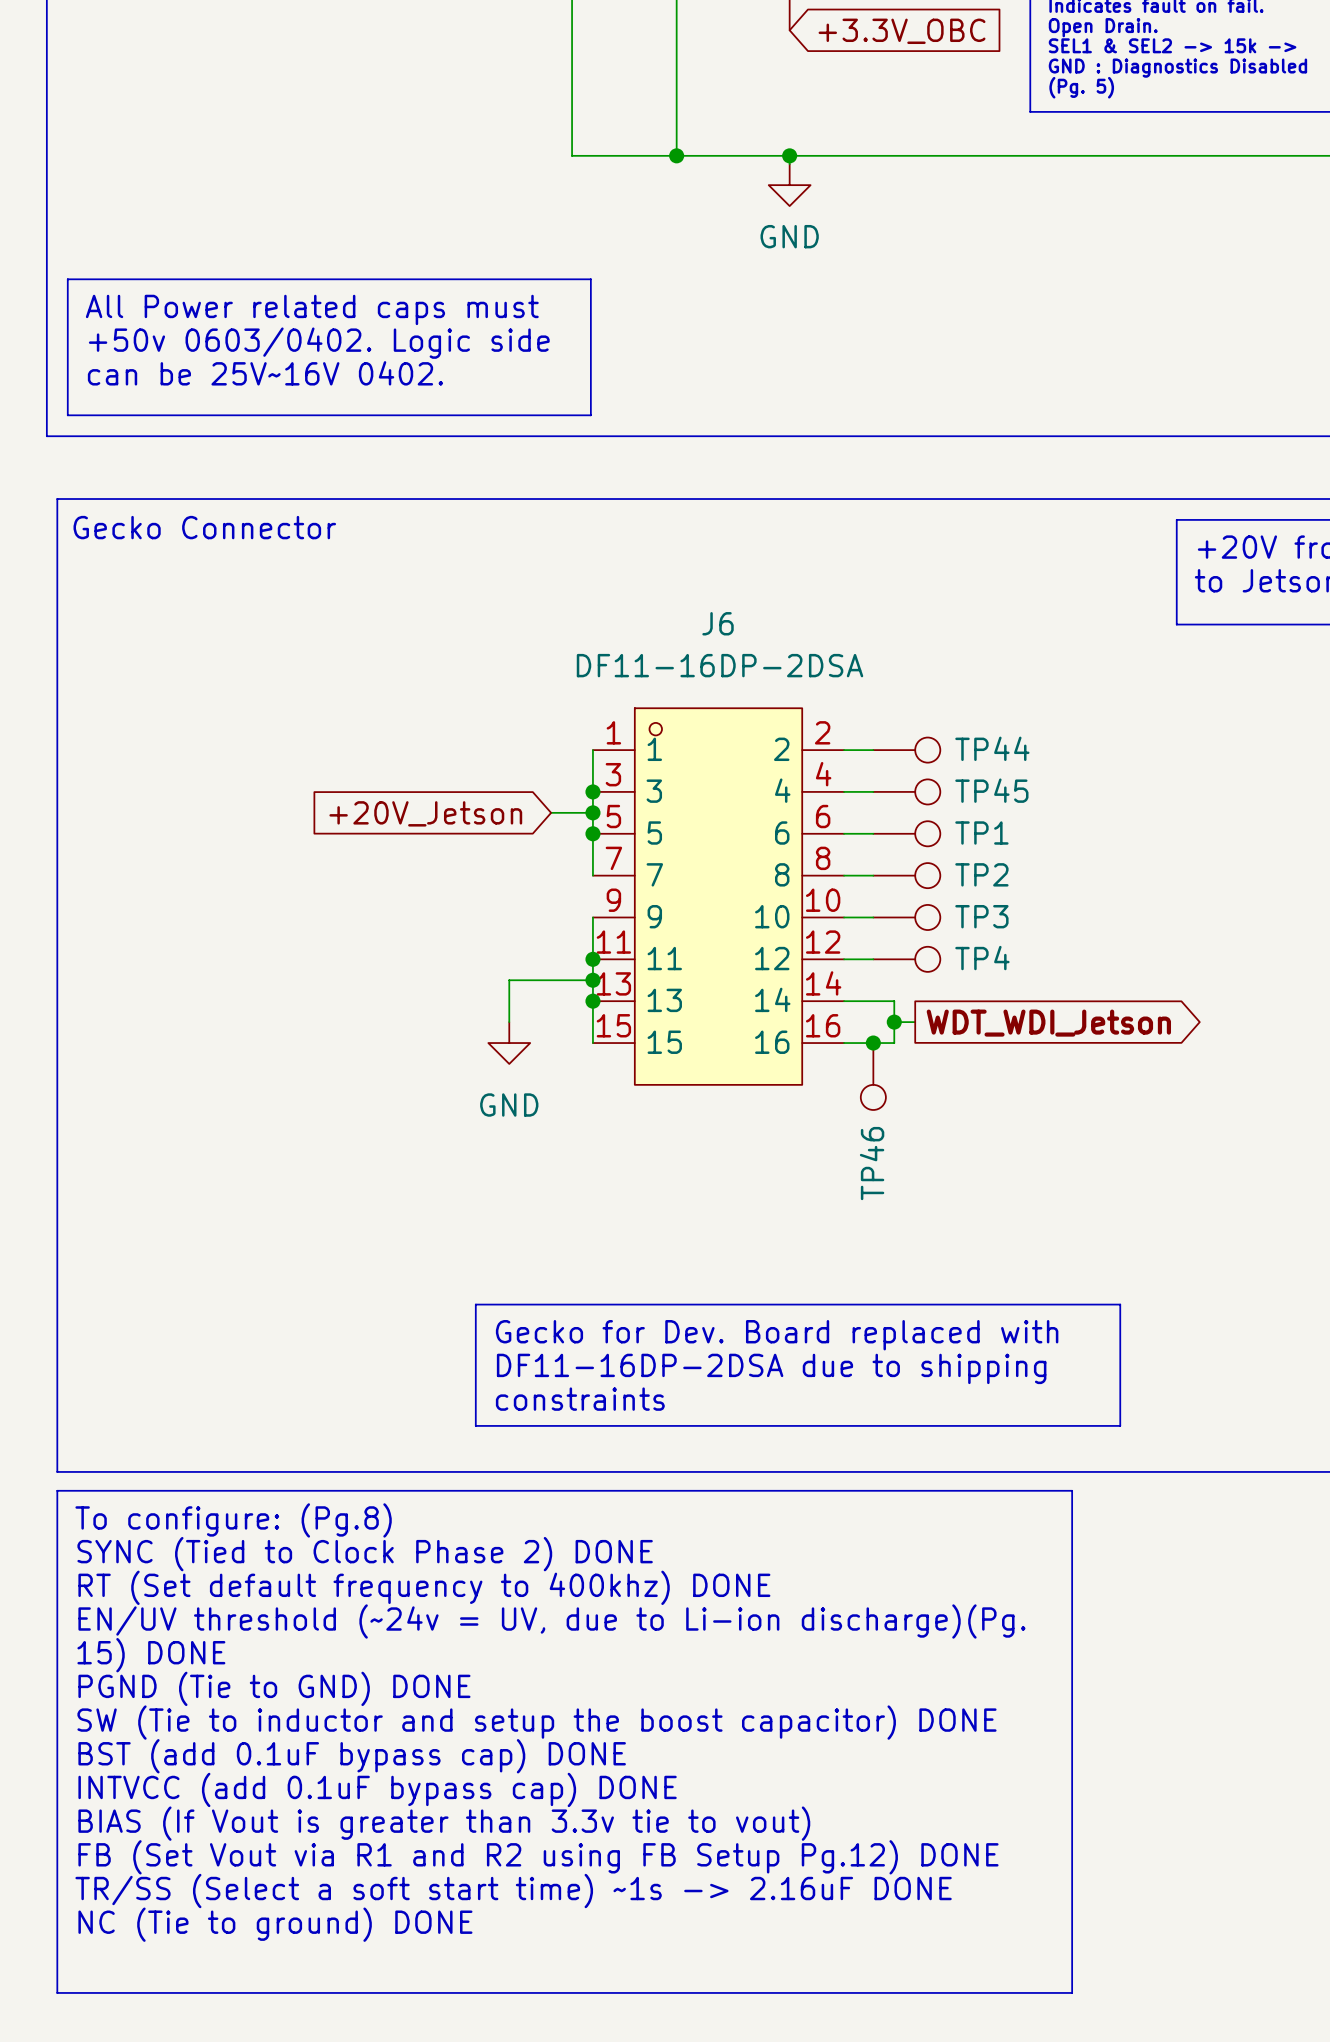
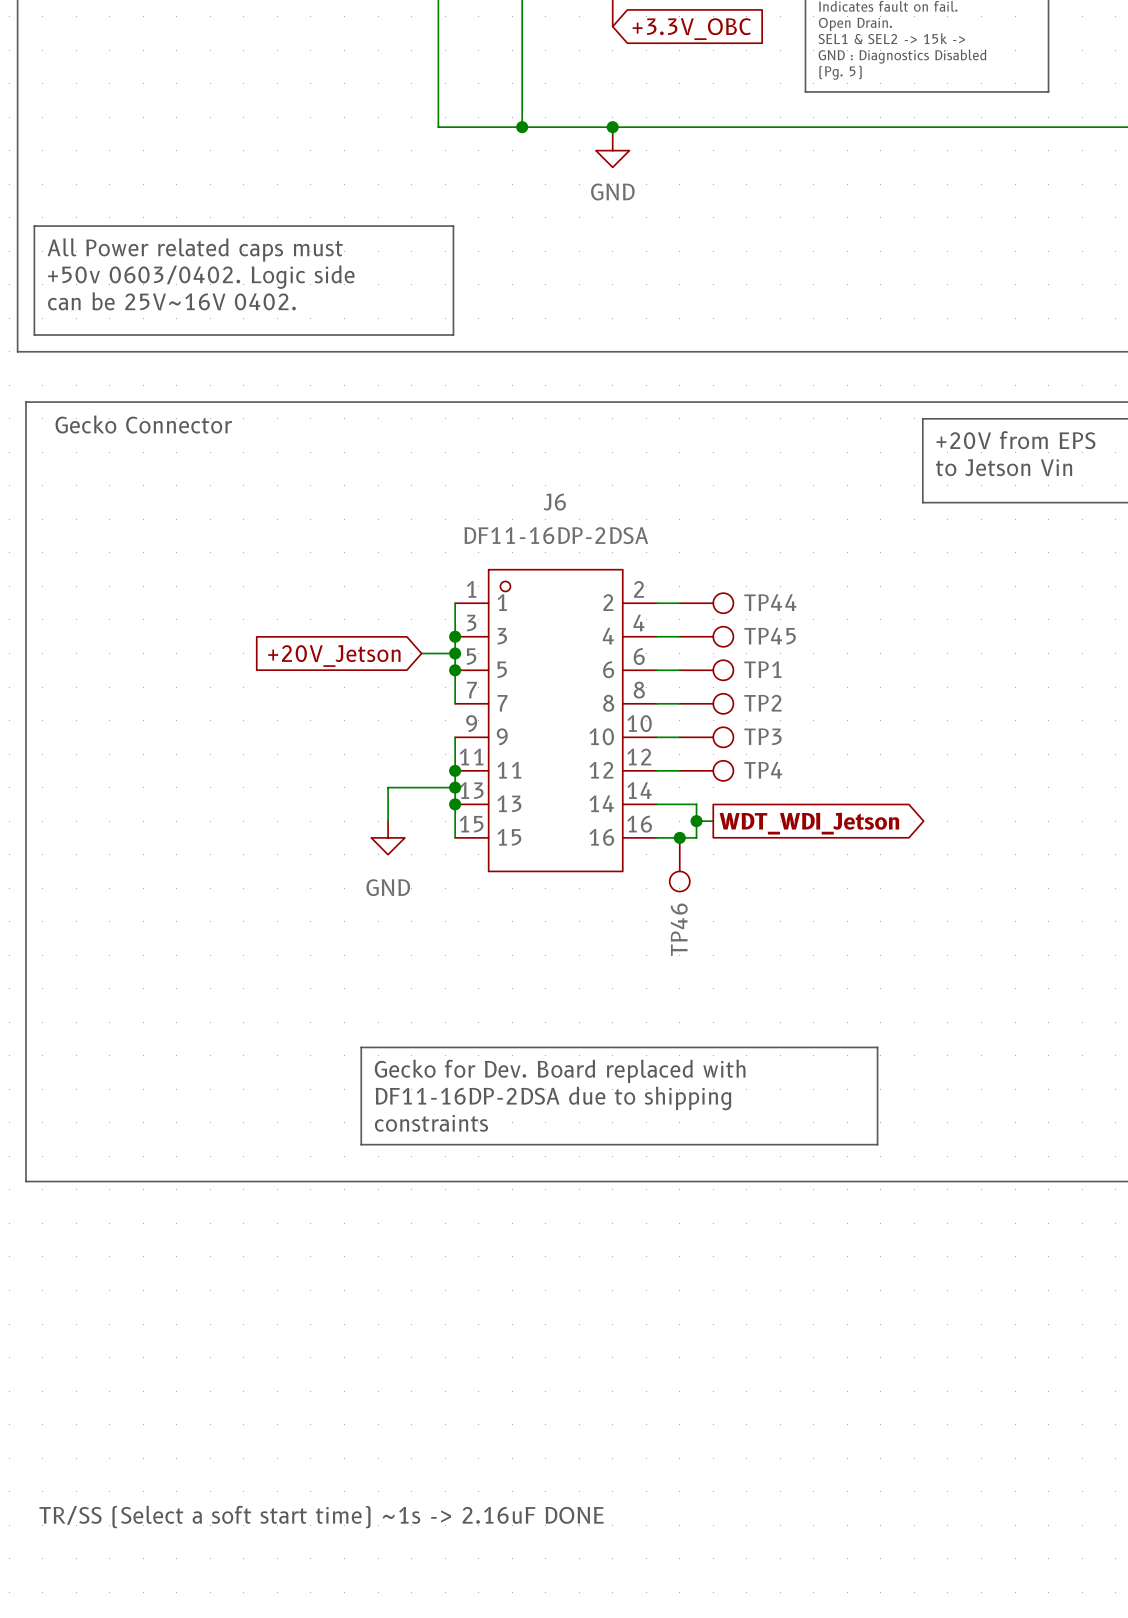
line: (57, 1490) (1072, 1490) (1072, 1992) (57, 1992) (57, 1490) -> none
text: To configure: (Pg.8) (233, 1520) -> none
text: SYNC (Tied to Clock Phase 2) DONE (365, 1554) -> none
text: RT (Set default frequency to 400khz) DONE (424, 1587) -> none
text: EN/UV threshold (~24v = UV, due to Li-ion discharge)(Pg. (551, 1621) -> none
text: 15) DONE (151, 1655) -> none
text: PGND (Tie to GND) DONE (274, 1688) -> none
text: SW (Tie to inductor and setup the boost capacitor) DONE (536, 1722) -> none
text: BST (add 0.1uF bypass cap) DONE (352, 1756) -> none
text: INTVCC (add 0.1uF bypass cap) DONE (377, 1789) -> none
text: BIAS (If Vout is greater than 3.3v tie to vout) (444, 1823) -> none
text: FB (Set Vout via R1 and R2 using FB Setup Pg.12) DONE (538, 1857) -> none
text: NC (Tie to ground) DONE (275, 1924) -> none

